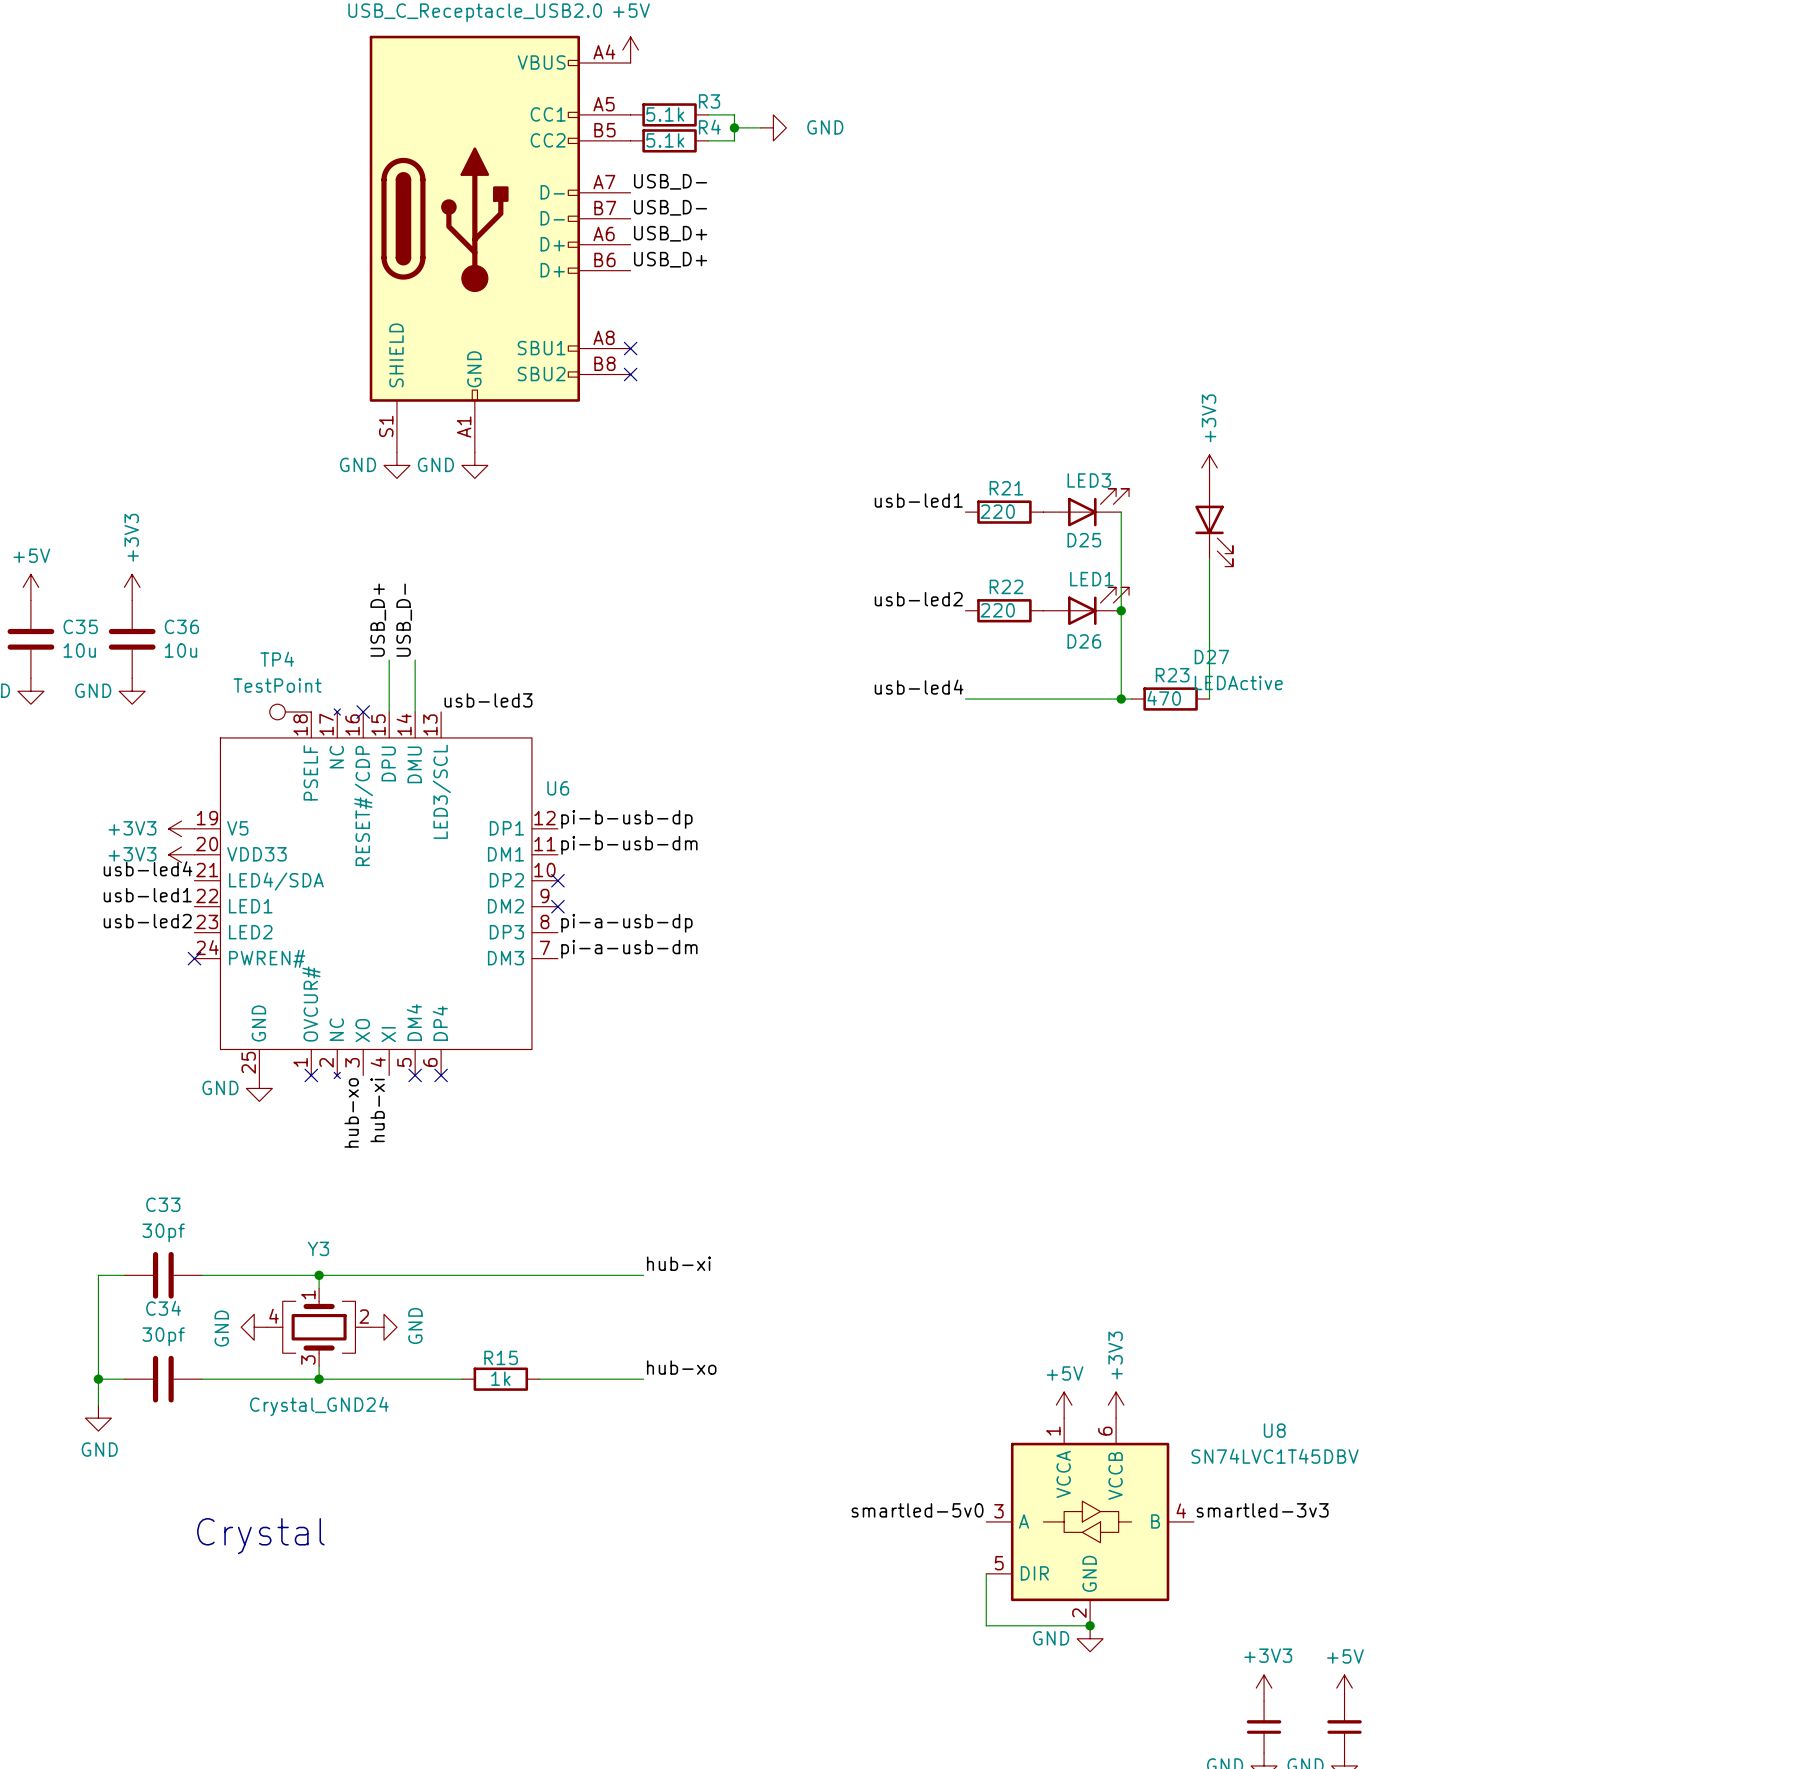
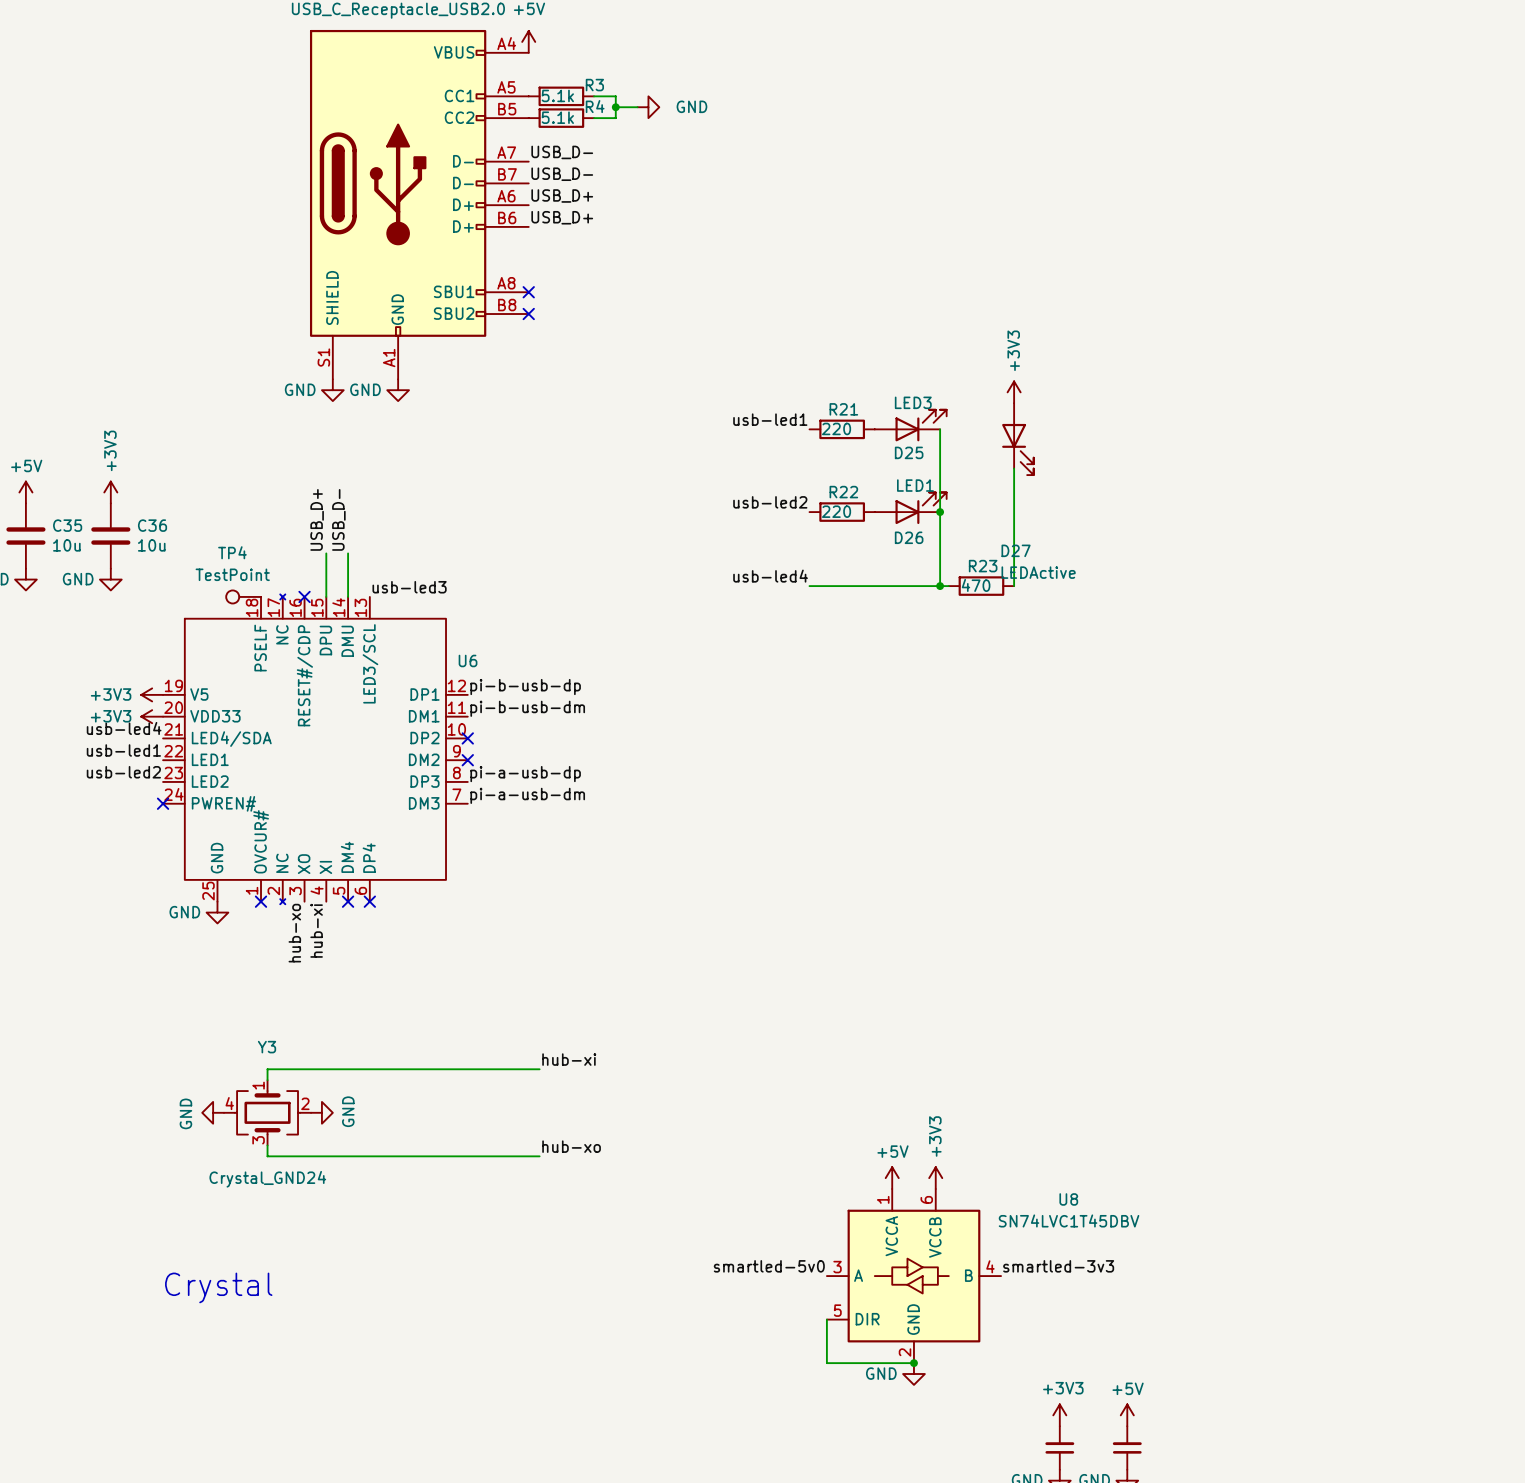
wire: (124, 1275) (98, 1275) (98, 1405) -> none
C33: 30pf (163, 1275) -> none
wire: (202, 1275) (319, 1275) -> none
junction: (319, 1275) -> none
wire: (98, 1379) (124, 1379) -> none
junction: (98, 1379) -> none
C34: 30pf (163, 1379) -> none
wire: (202, 1379) (319, 1379) -> none
junction: (319, 1379) -> none
wire: none -> (387, 1156) (452, 1156)
R15: 1k (500, 1379) -> none
power symbol: GND (98, 1418) -> none

